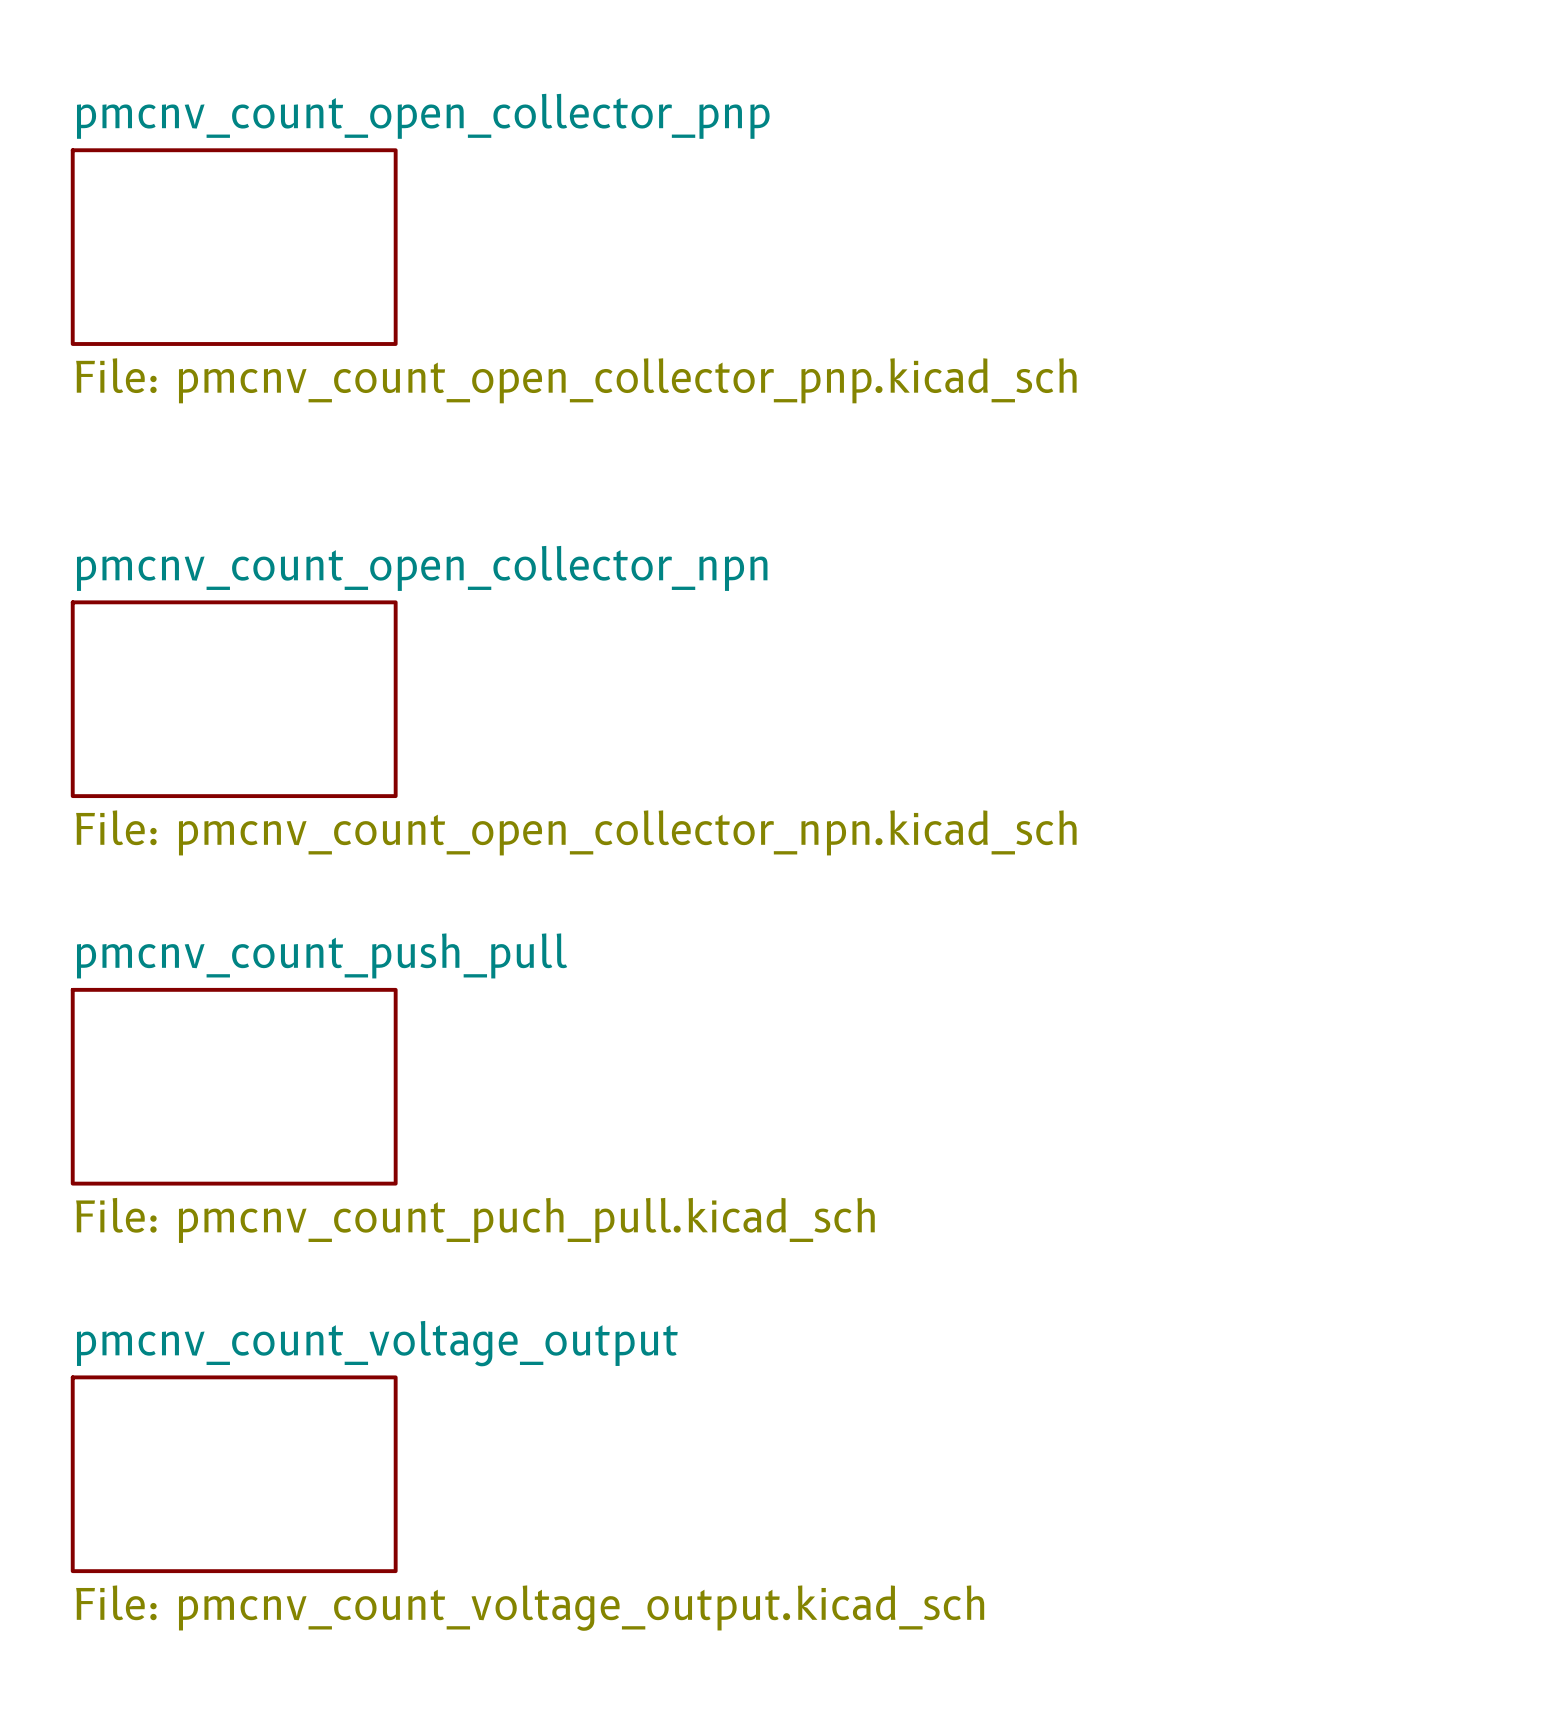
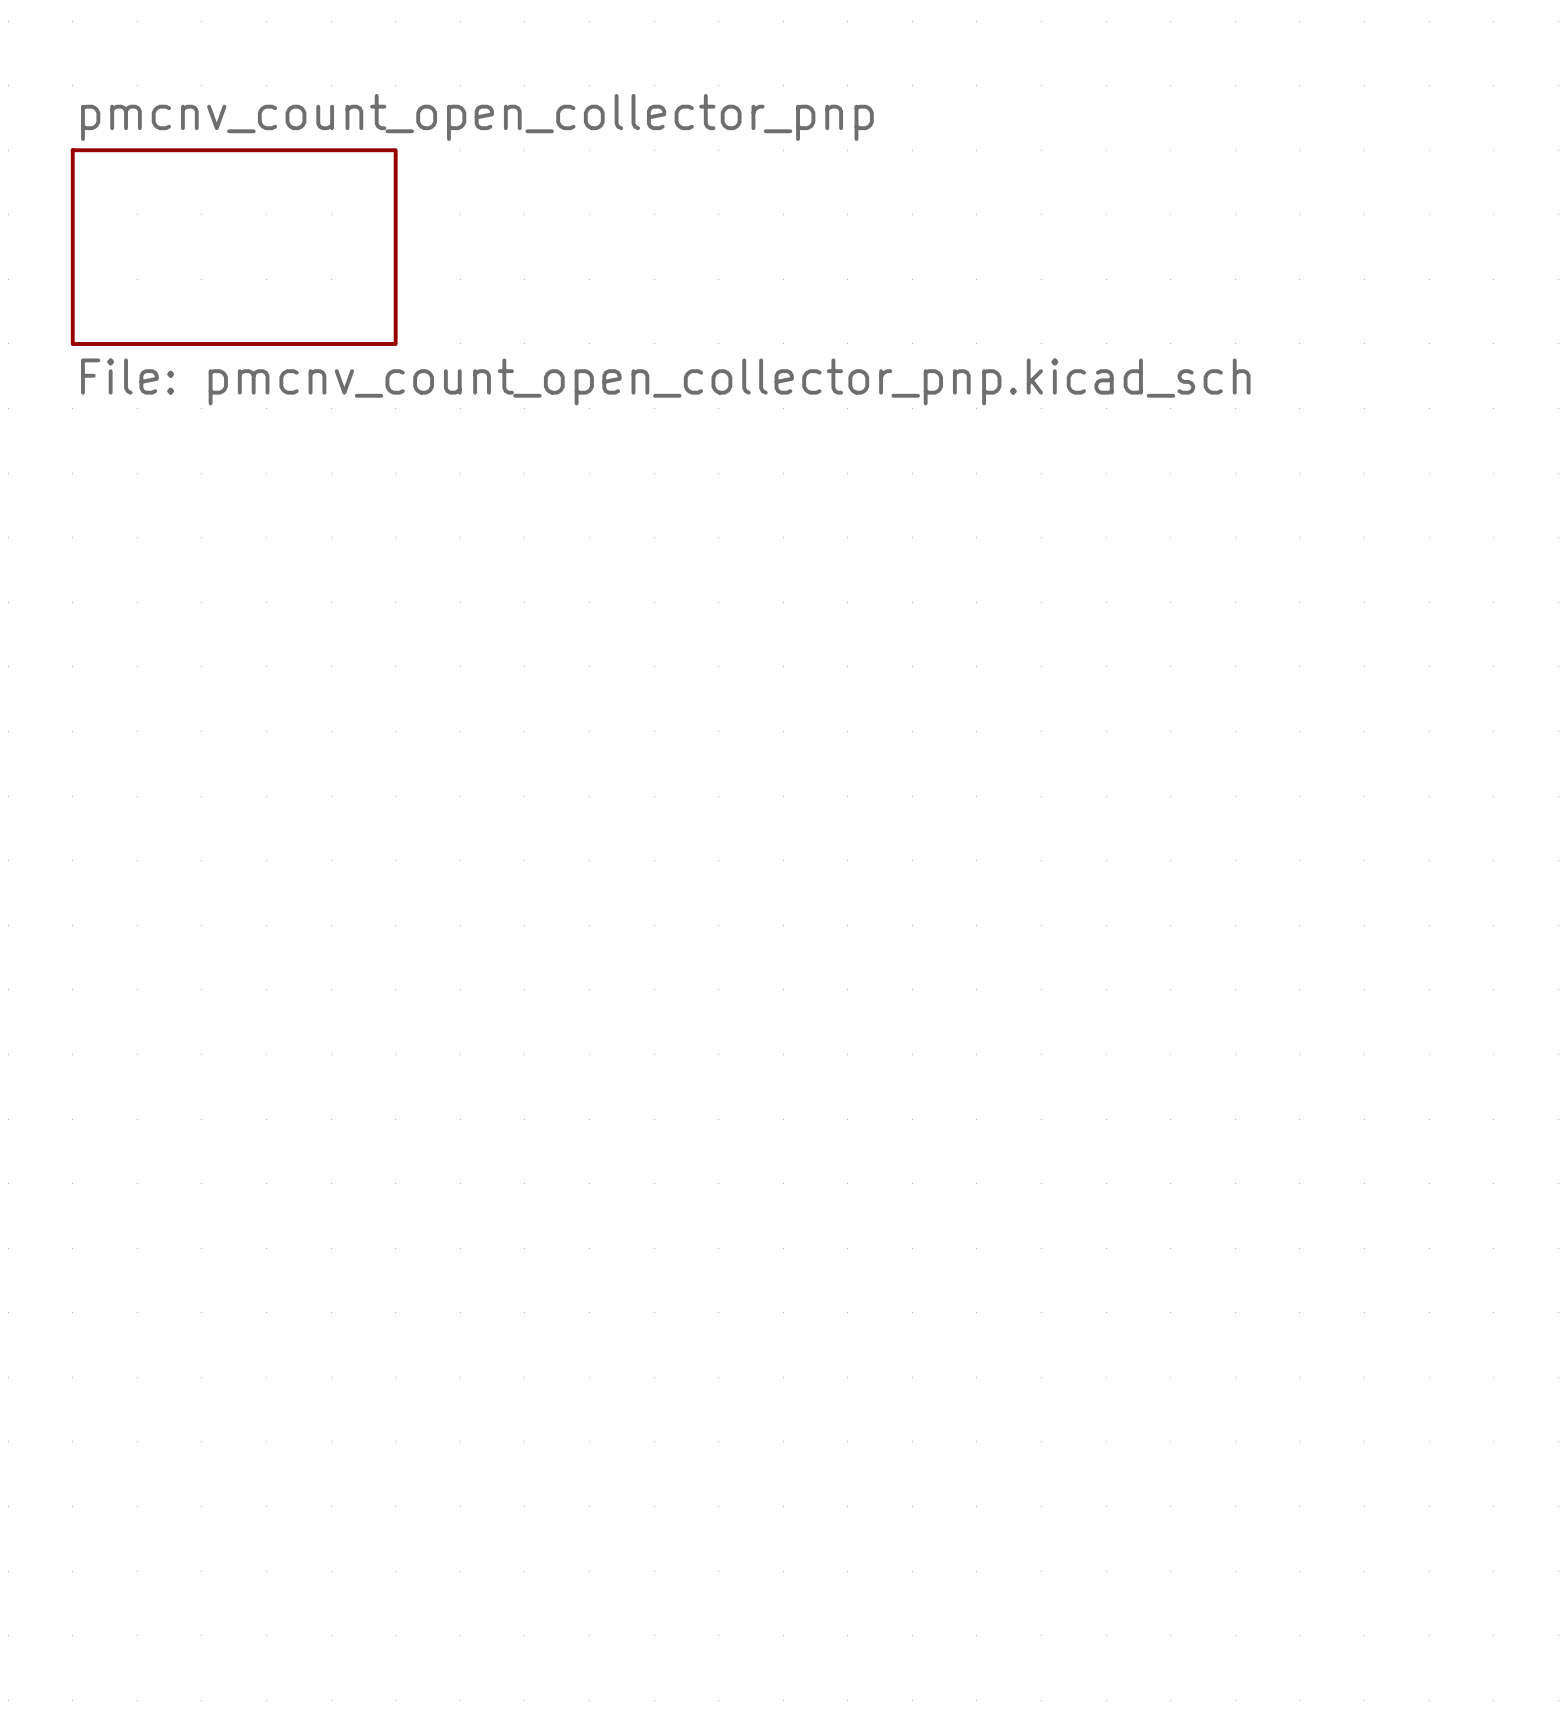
sheet pmcnv_count_open_collector_npn: File: pmcnv_count_open_collector_npn.kicad_sch (234, 699) -> none
sheet pmcnv_count_push_pull: File: pmcnv_count_puch_pull.kicad_sch (234, 1086) -> none
sheet pmcnv_count_voltage_output: File: pmcnv_count_voltage_output.kicad_sch (234, 1474) -> none

